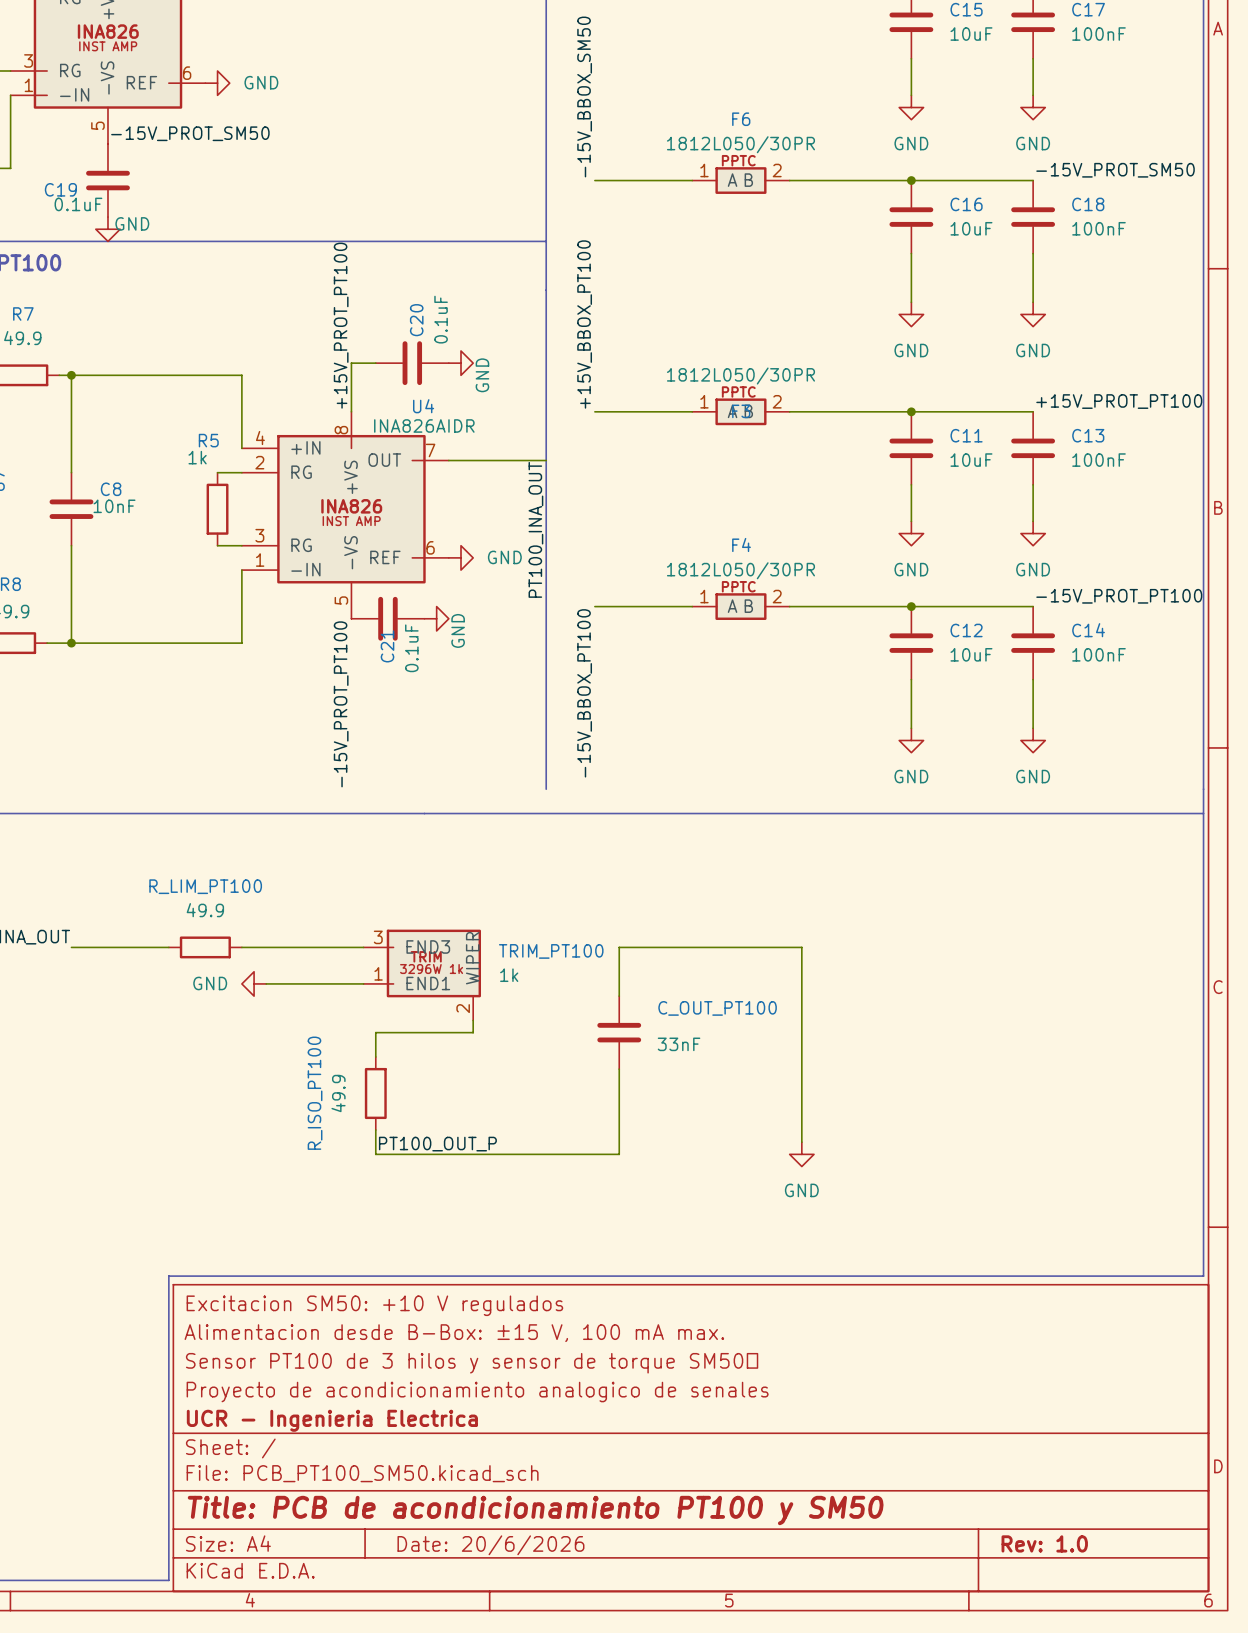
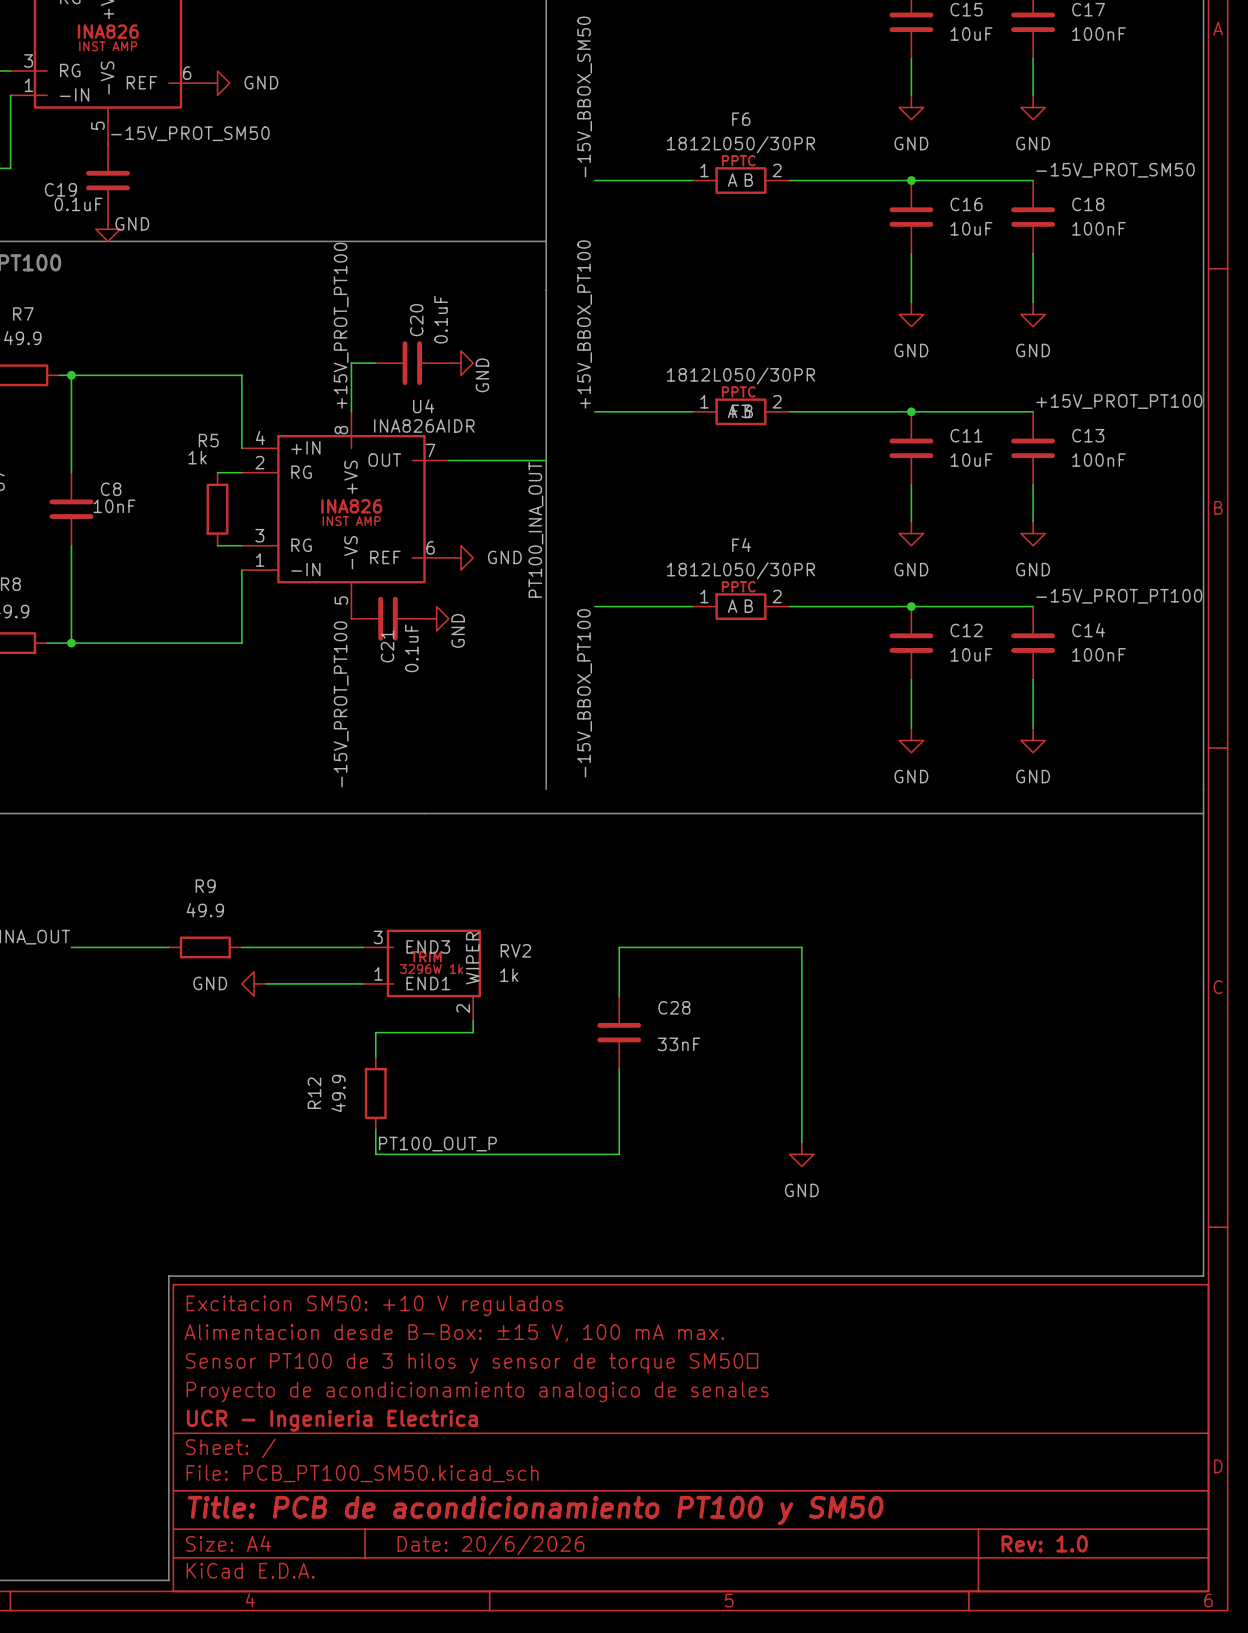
R_LIM_PT100 name: R_LIM_PT100 (205, 886) -> R9 (205, 886)
TRIM_PT100 name: TRIM_PT100 (551, 951) -> RV2 (515, 950)
C_OUT_PT100 name: C_OUT_PT100 (717, 1008) -> C28 (674, 1007)
R_ISO_PT100 name: R_ISO_PT100 (315, 1093) -> R12 (314, 1093)

